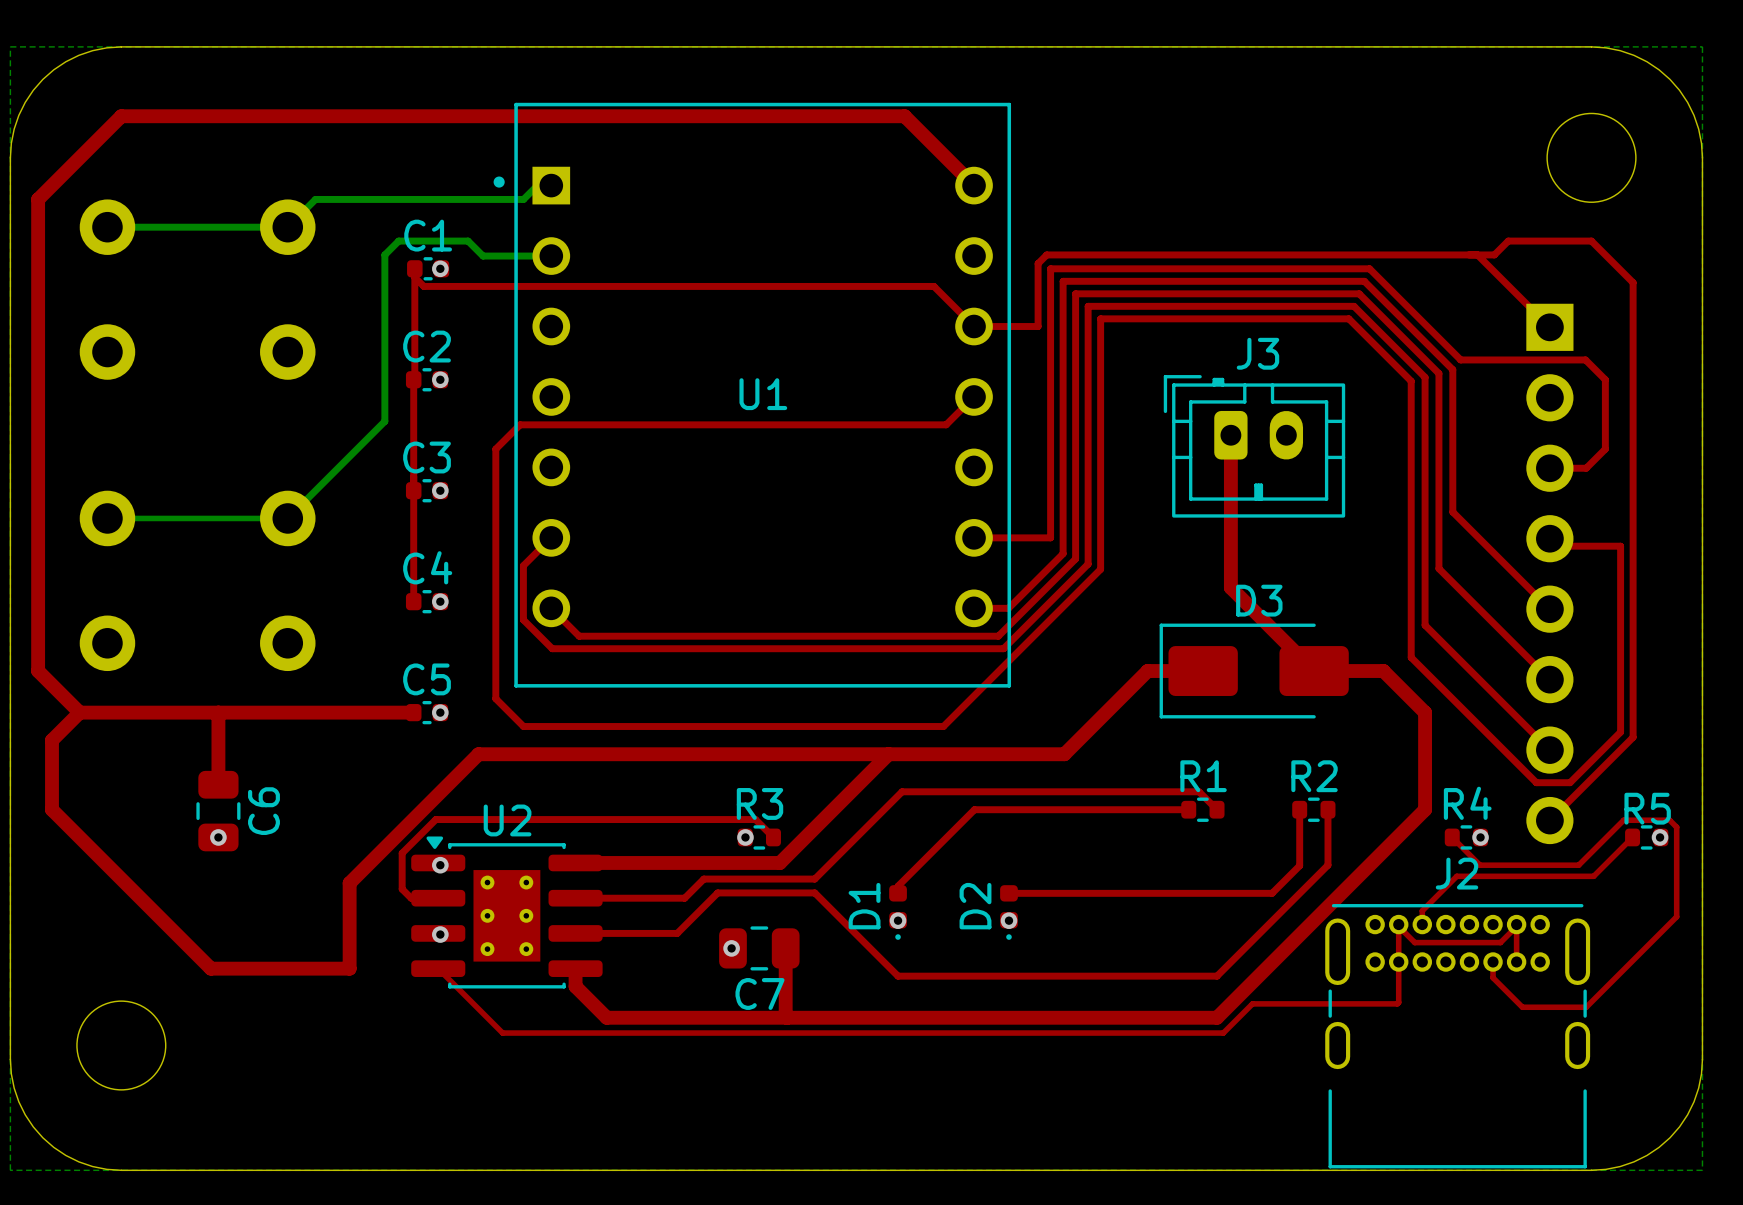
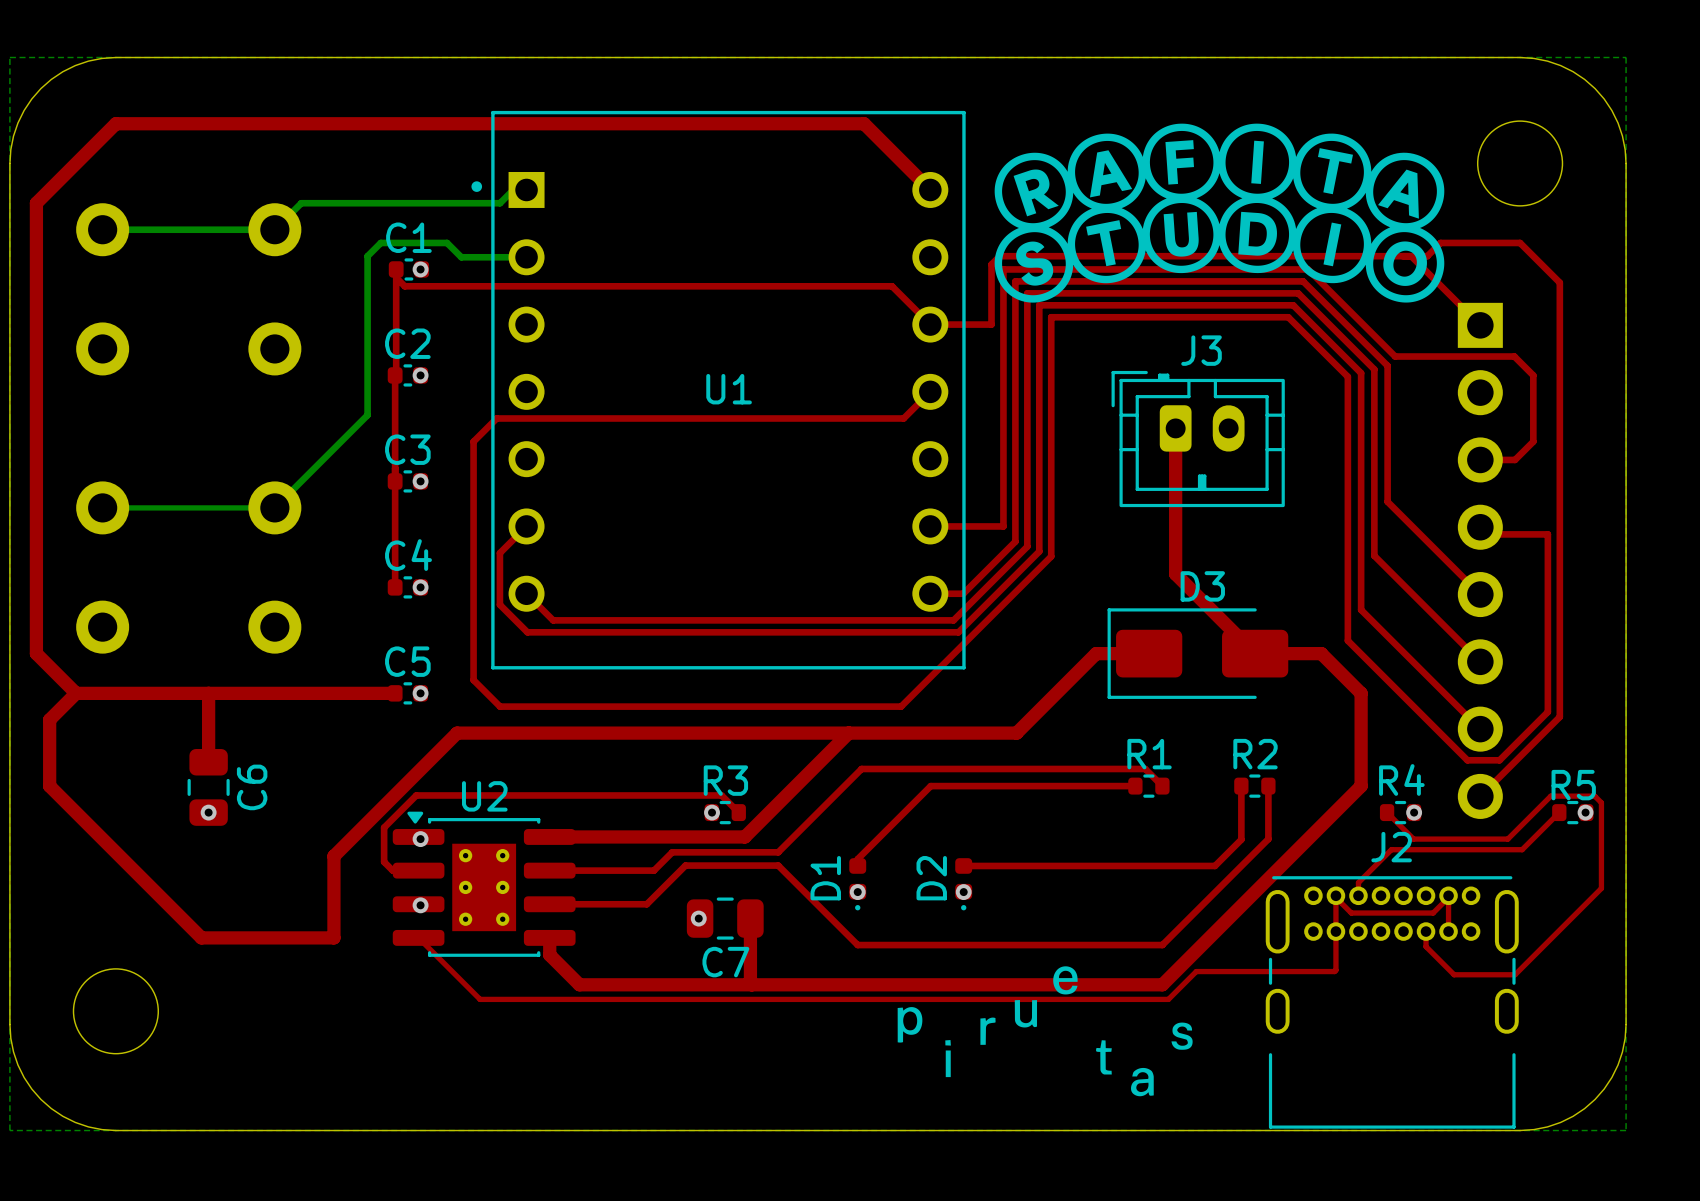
drawing: none -> [994, 123, 1445, 303]
drawing: none -> [897, 966, 1078, 1078]
drawing: none -> [1096, 1022, 1193, 1097]

